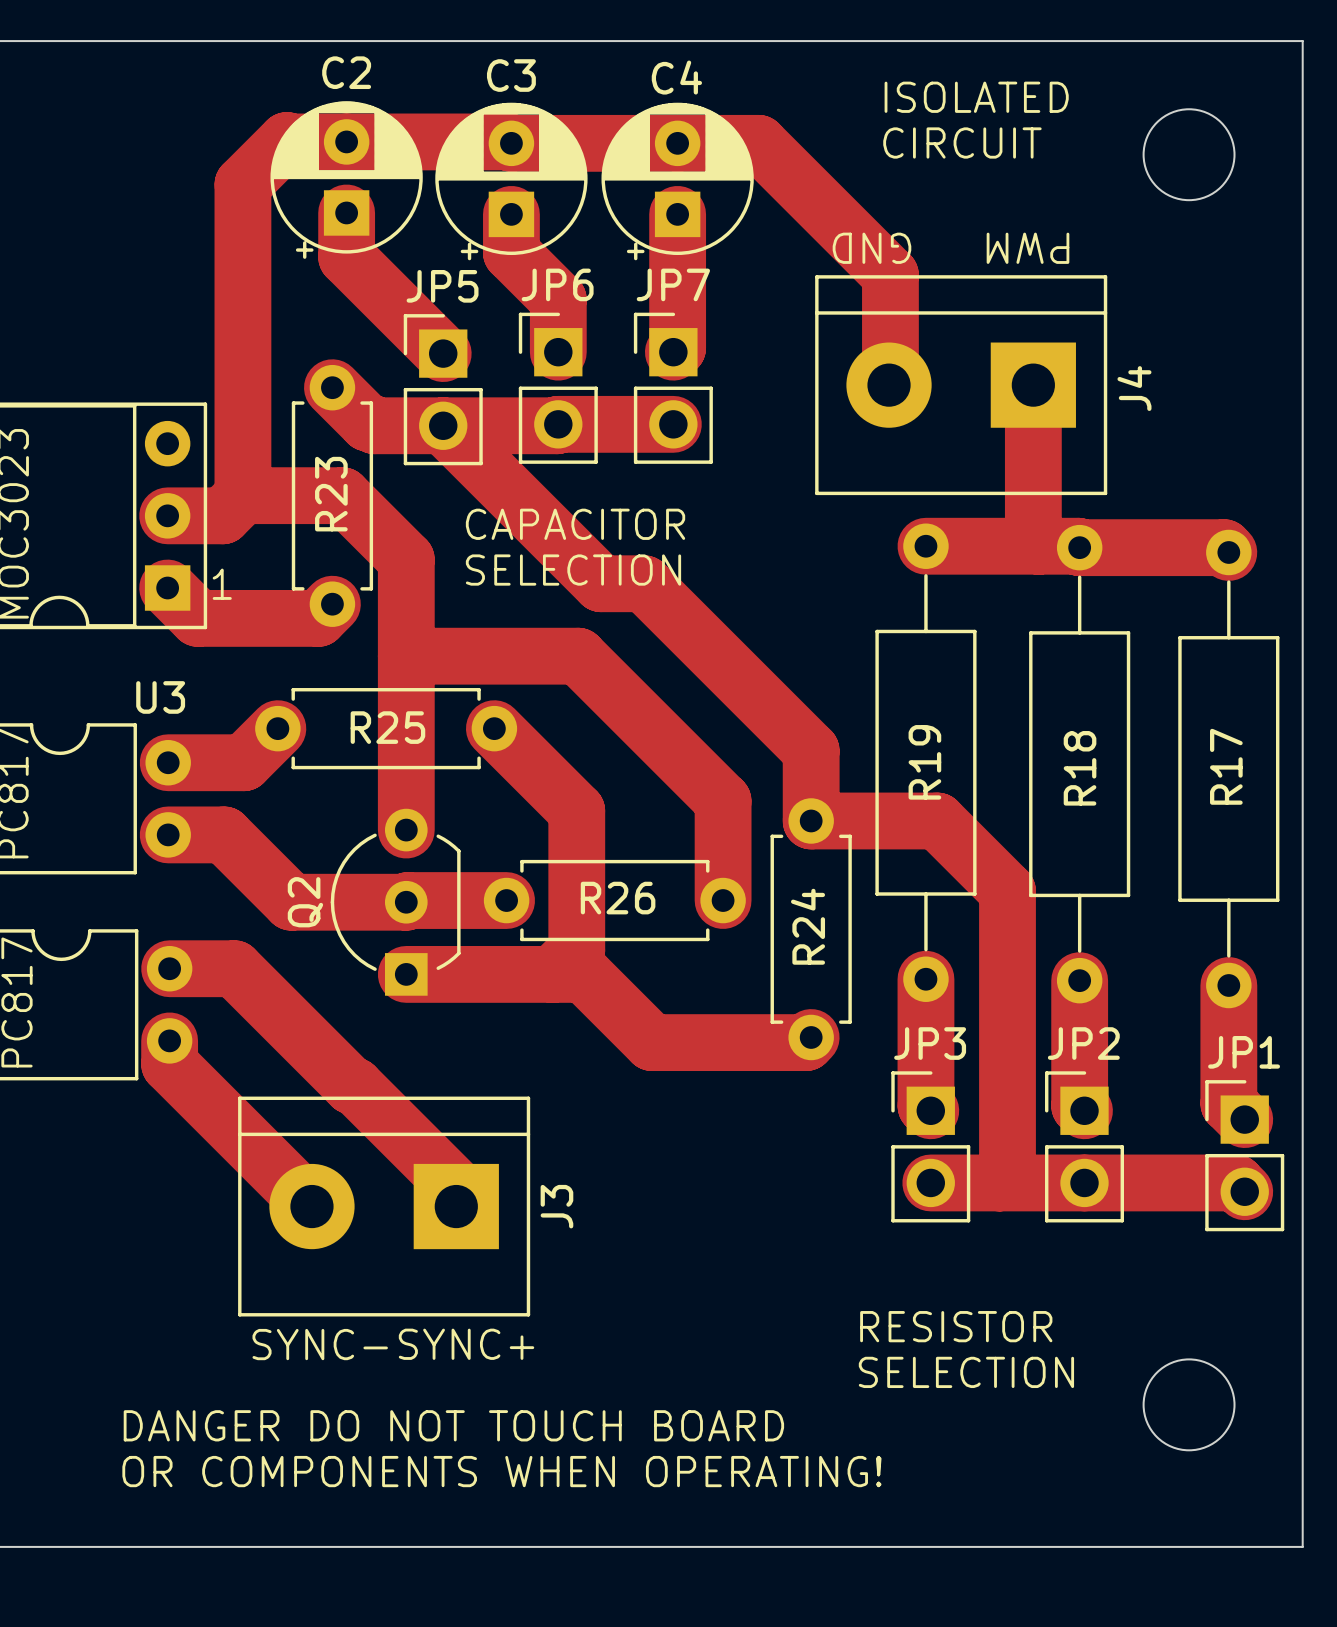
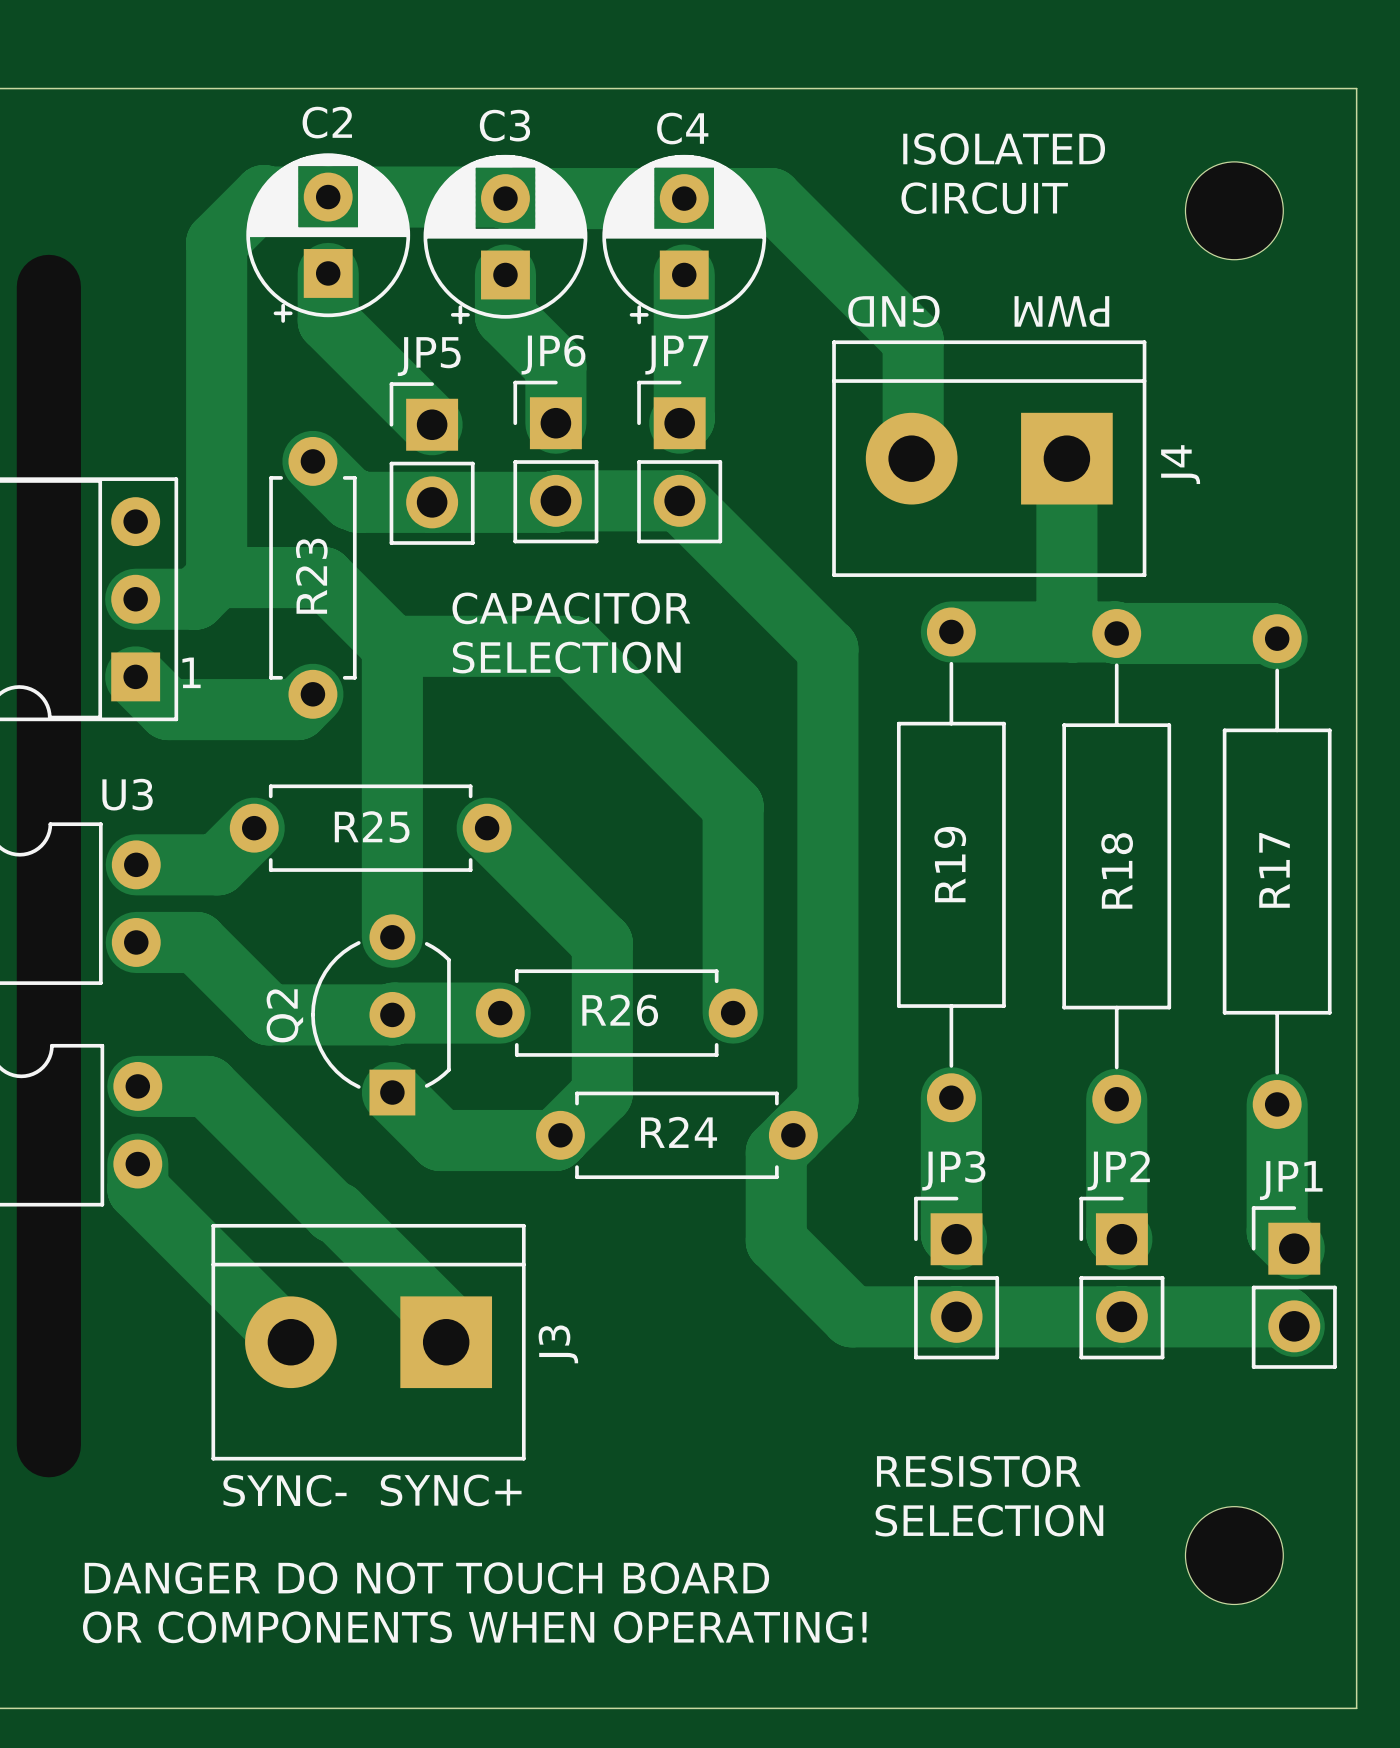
track: (443, 425) (601, 583) (644, 583) (811, 750) -> (679, 500) (827, 649) (827, 852)
track: (406, 656) (578, 656) (723, 801) -> (392, 646) (572, 646) (733, 806) (733, 906)
track: (576, 811) (576, 950) (552, 974) -> (575, 916) (602, 943) (602, 1093) (555, 1140) (440, 1140) (392, 1092)
track: (811, 820) (937, 820) (1007, 891) (1007, 1175) (999, 1182) -> (827, 927) (827, 1100) (776, 1152) (776, 1241) (852, 1316) (956, 1316)
R24 rotation: 0° (811, 929) -> 90° clockwise (676, 1135)
R24 position: (811, 929) -> (676, 1135)
track: (406, 974) (583, 974) (652, 1042) (806, 1042) (811, 1037) -> none

